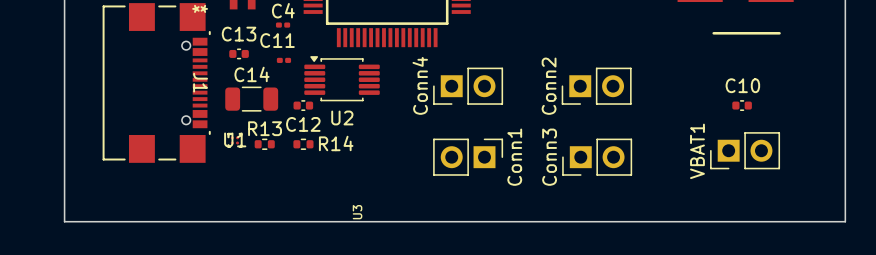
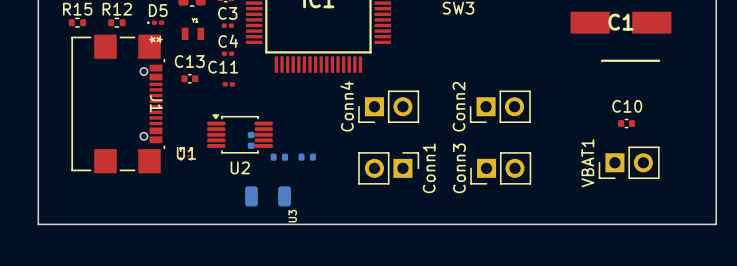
U2 position: (342, 78) -> (240, 133)
C14 side: top (251, 99) -> bottom (268, 196)
C12 side: top (303, 105) -> bottom (251, 140)
R13 side: top (264, 144) -> bottom (279, 157)
R14 side: top (303, 144) -> bottom (307, 157)

